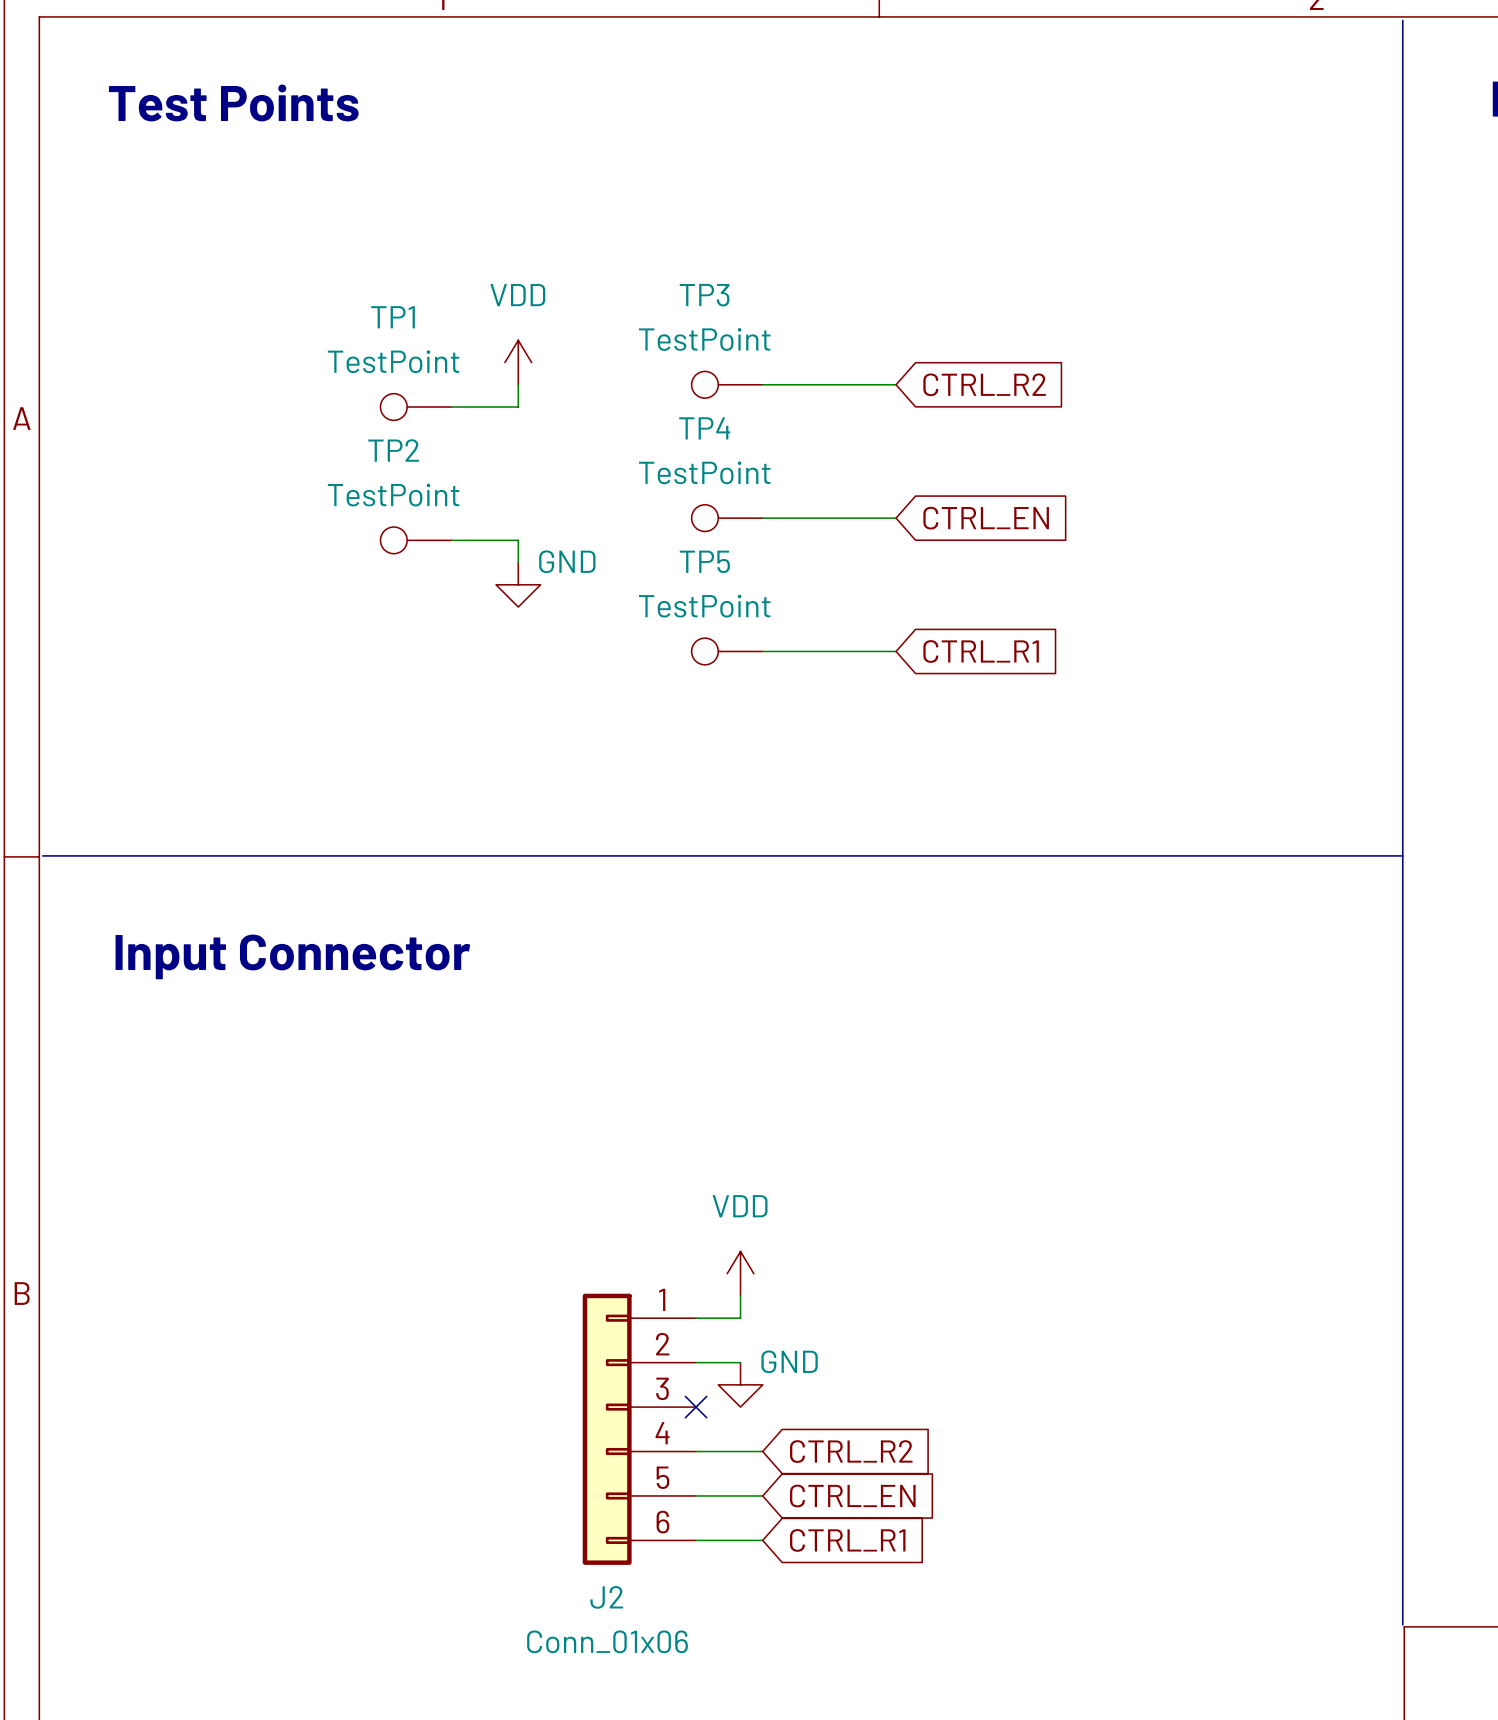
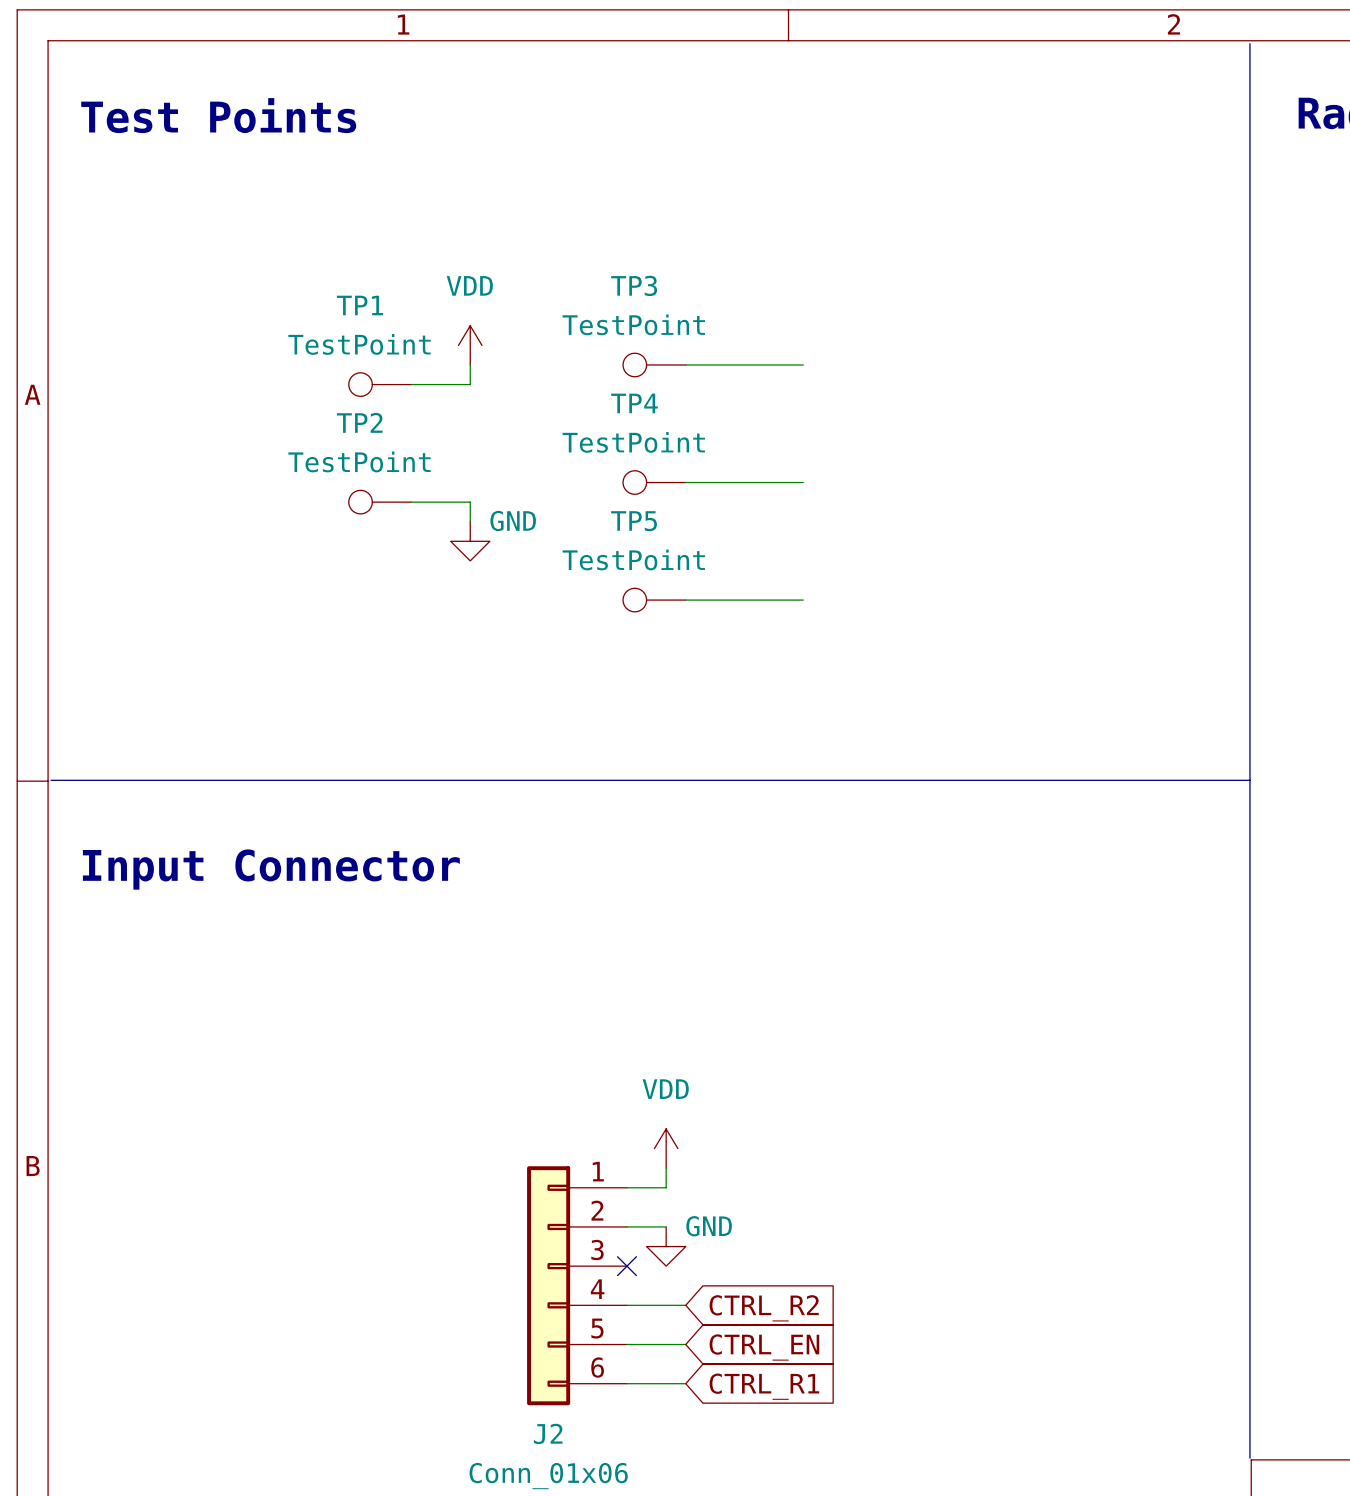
global label: CTRL_R2 (984, 384) -> none
global label: CTRL_EN (986, 518) -> none
global label: CTRL_R1 (981, 651) -> none

